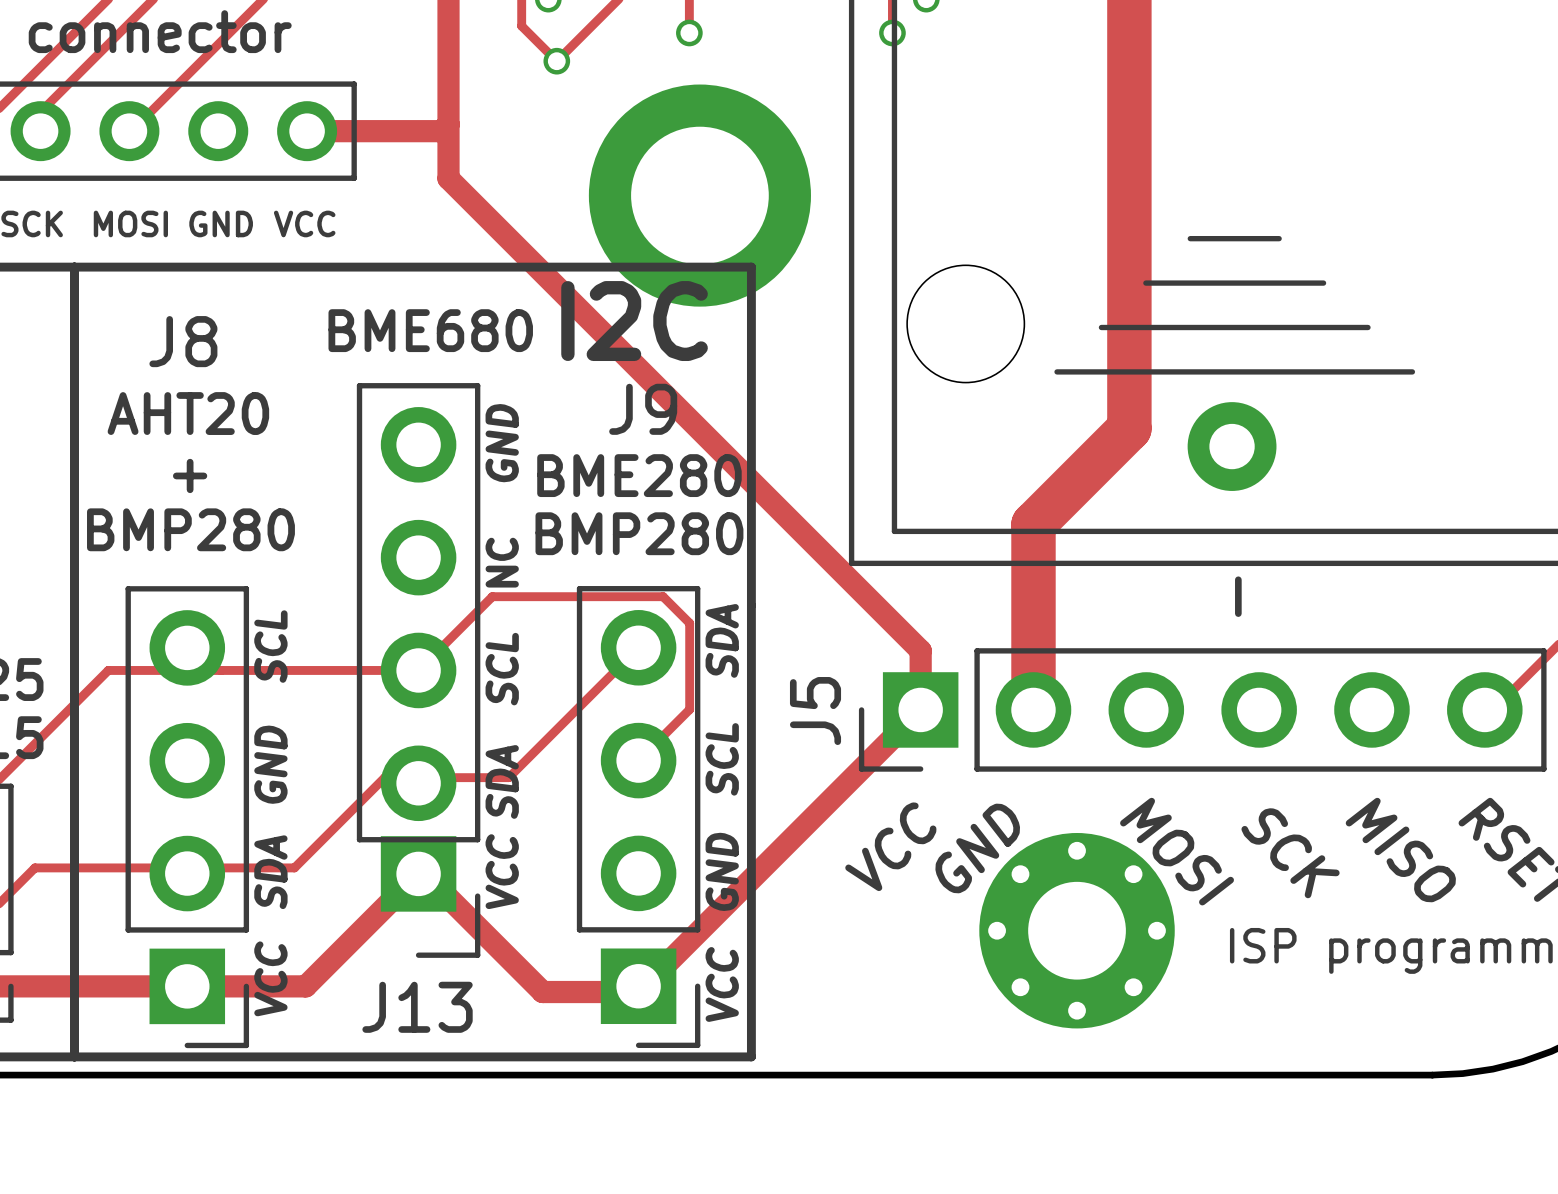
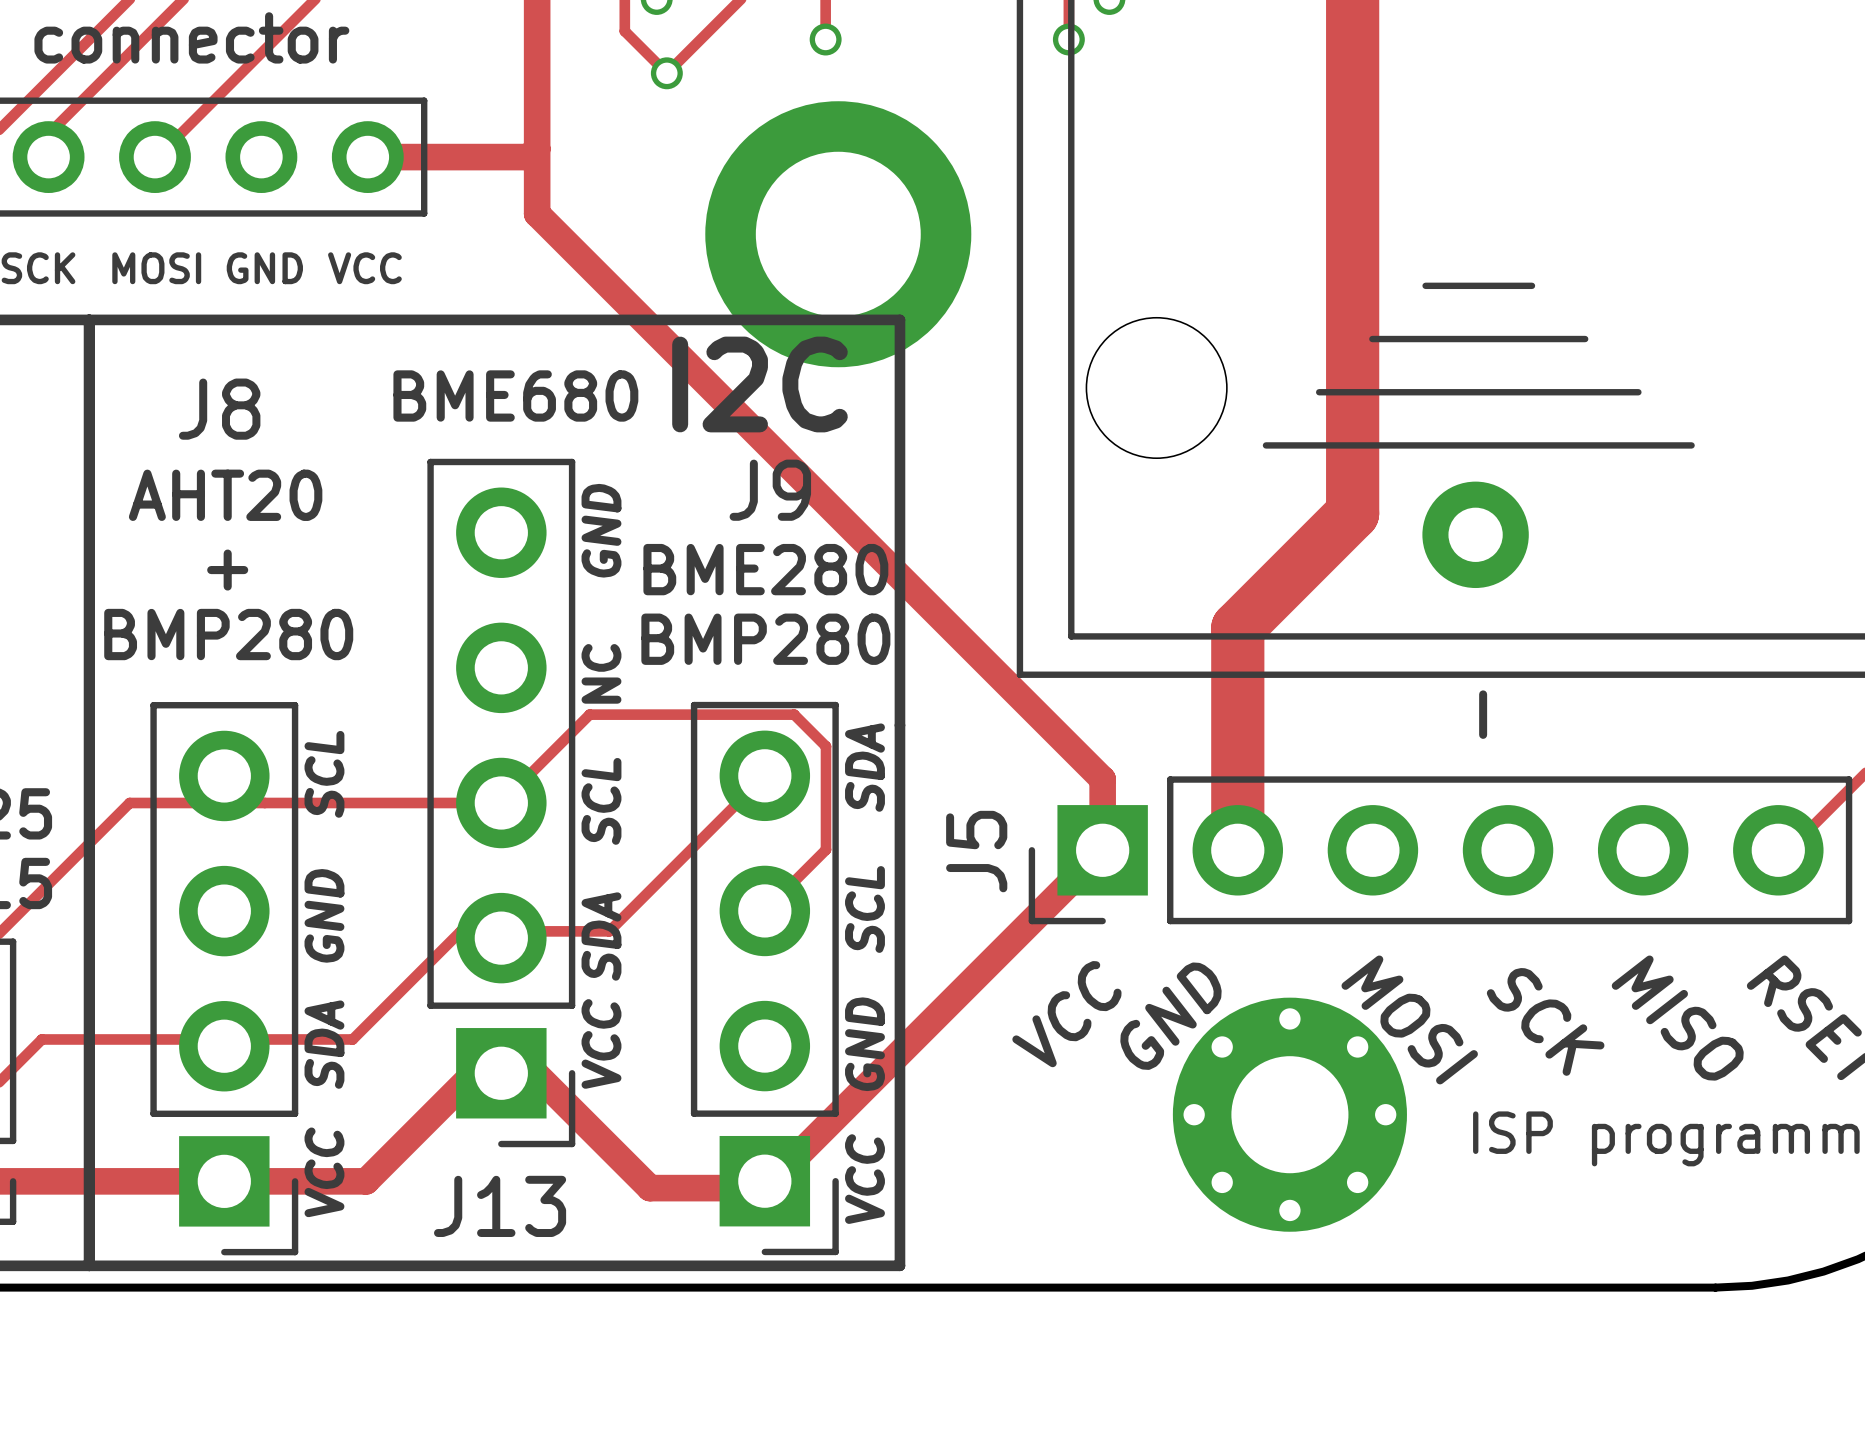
J13 footprint: [356, 383, 481, 958] -> [427, 458, 576, 1148]

